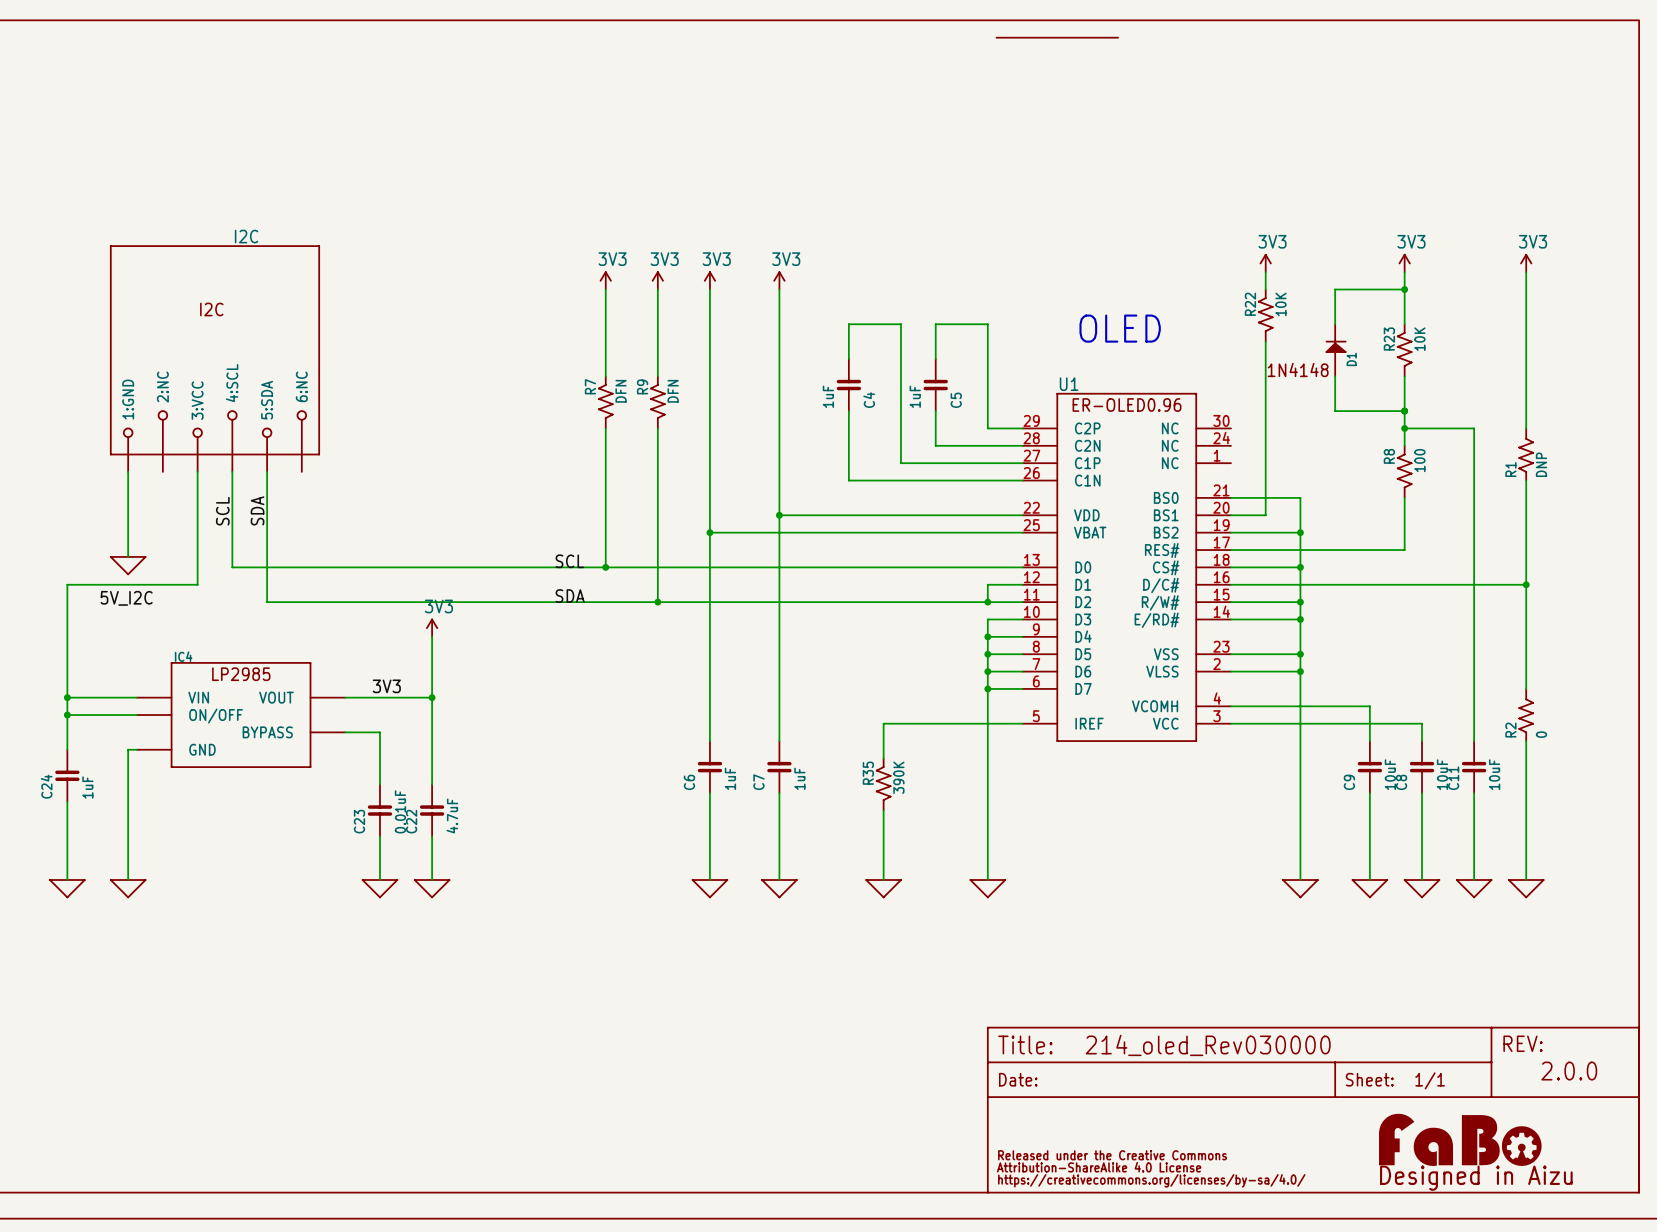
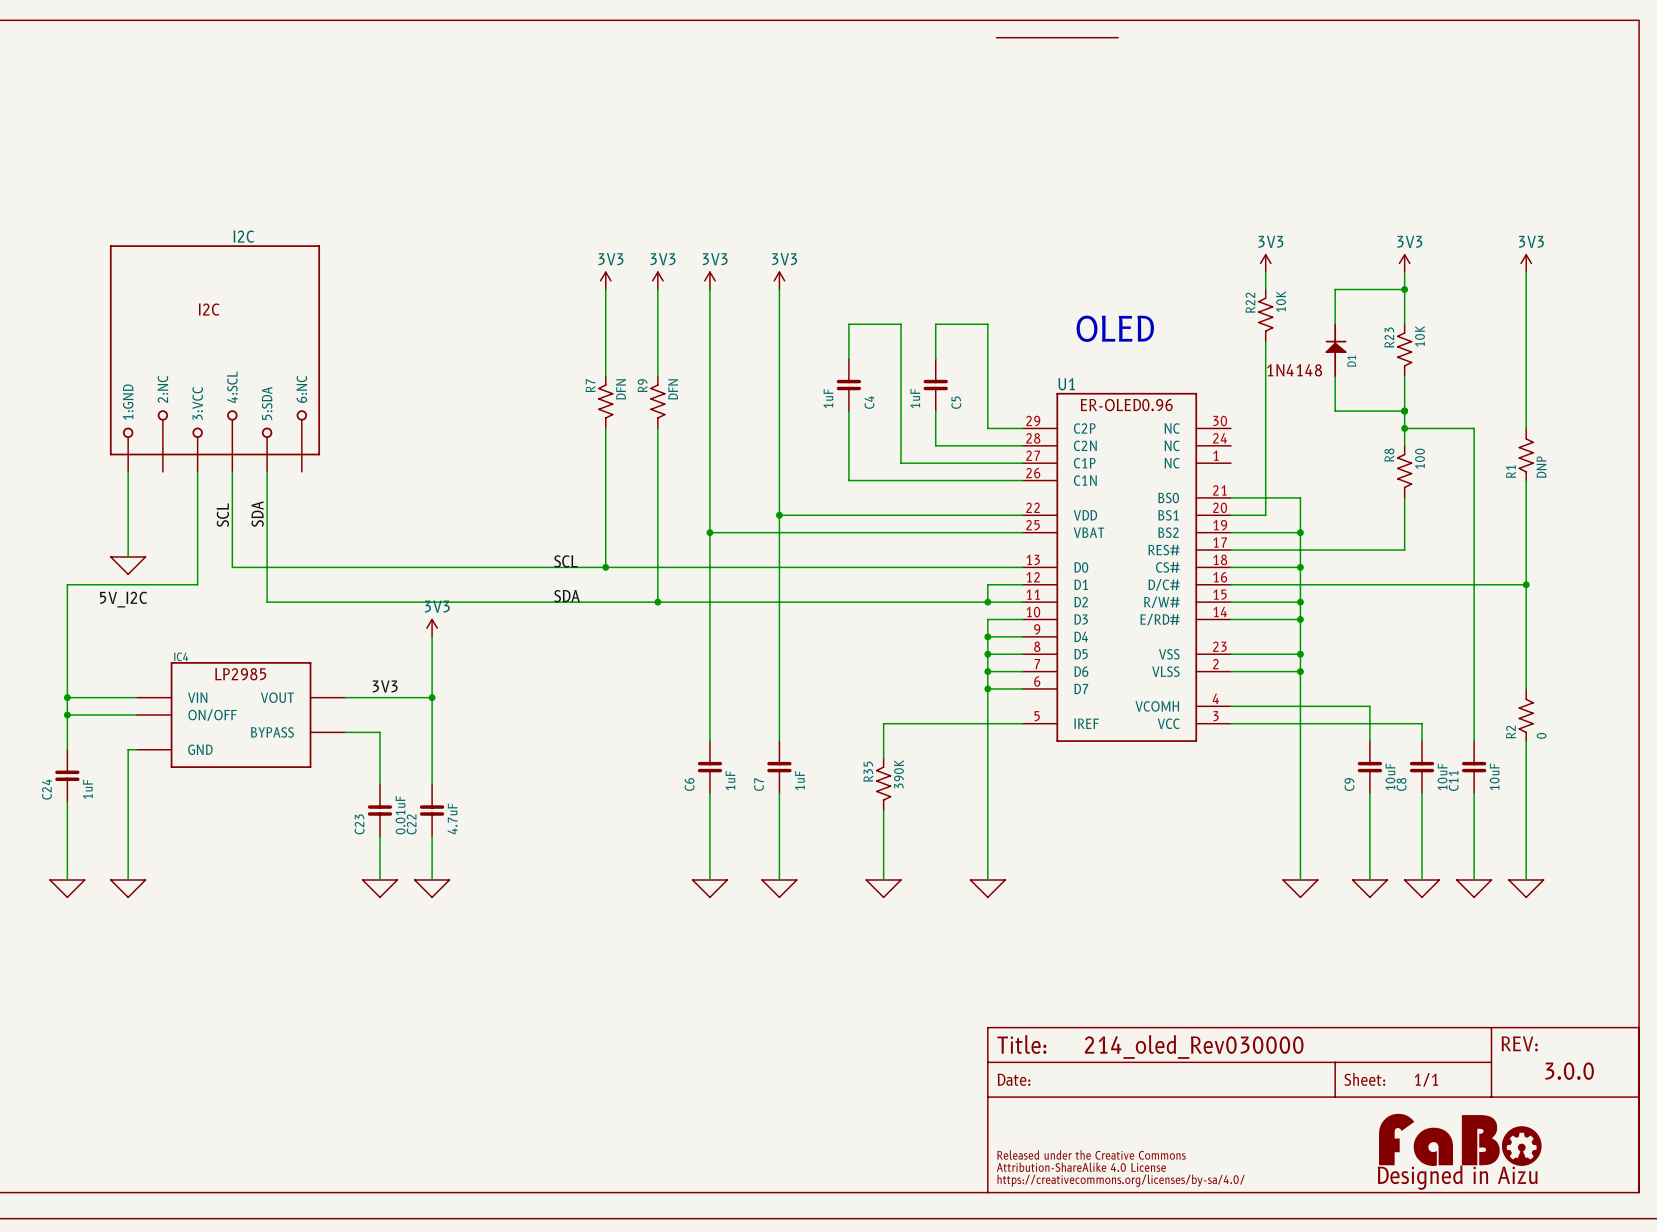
text: 2.0.0 (1569, 1071) -> 3.0.0 (1569, 1071)

